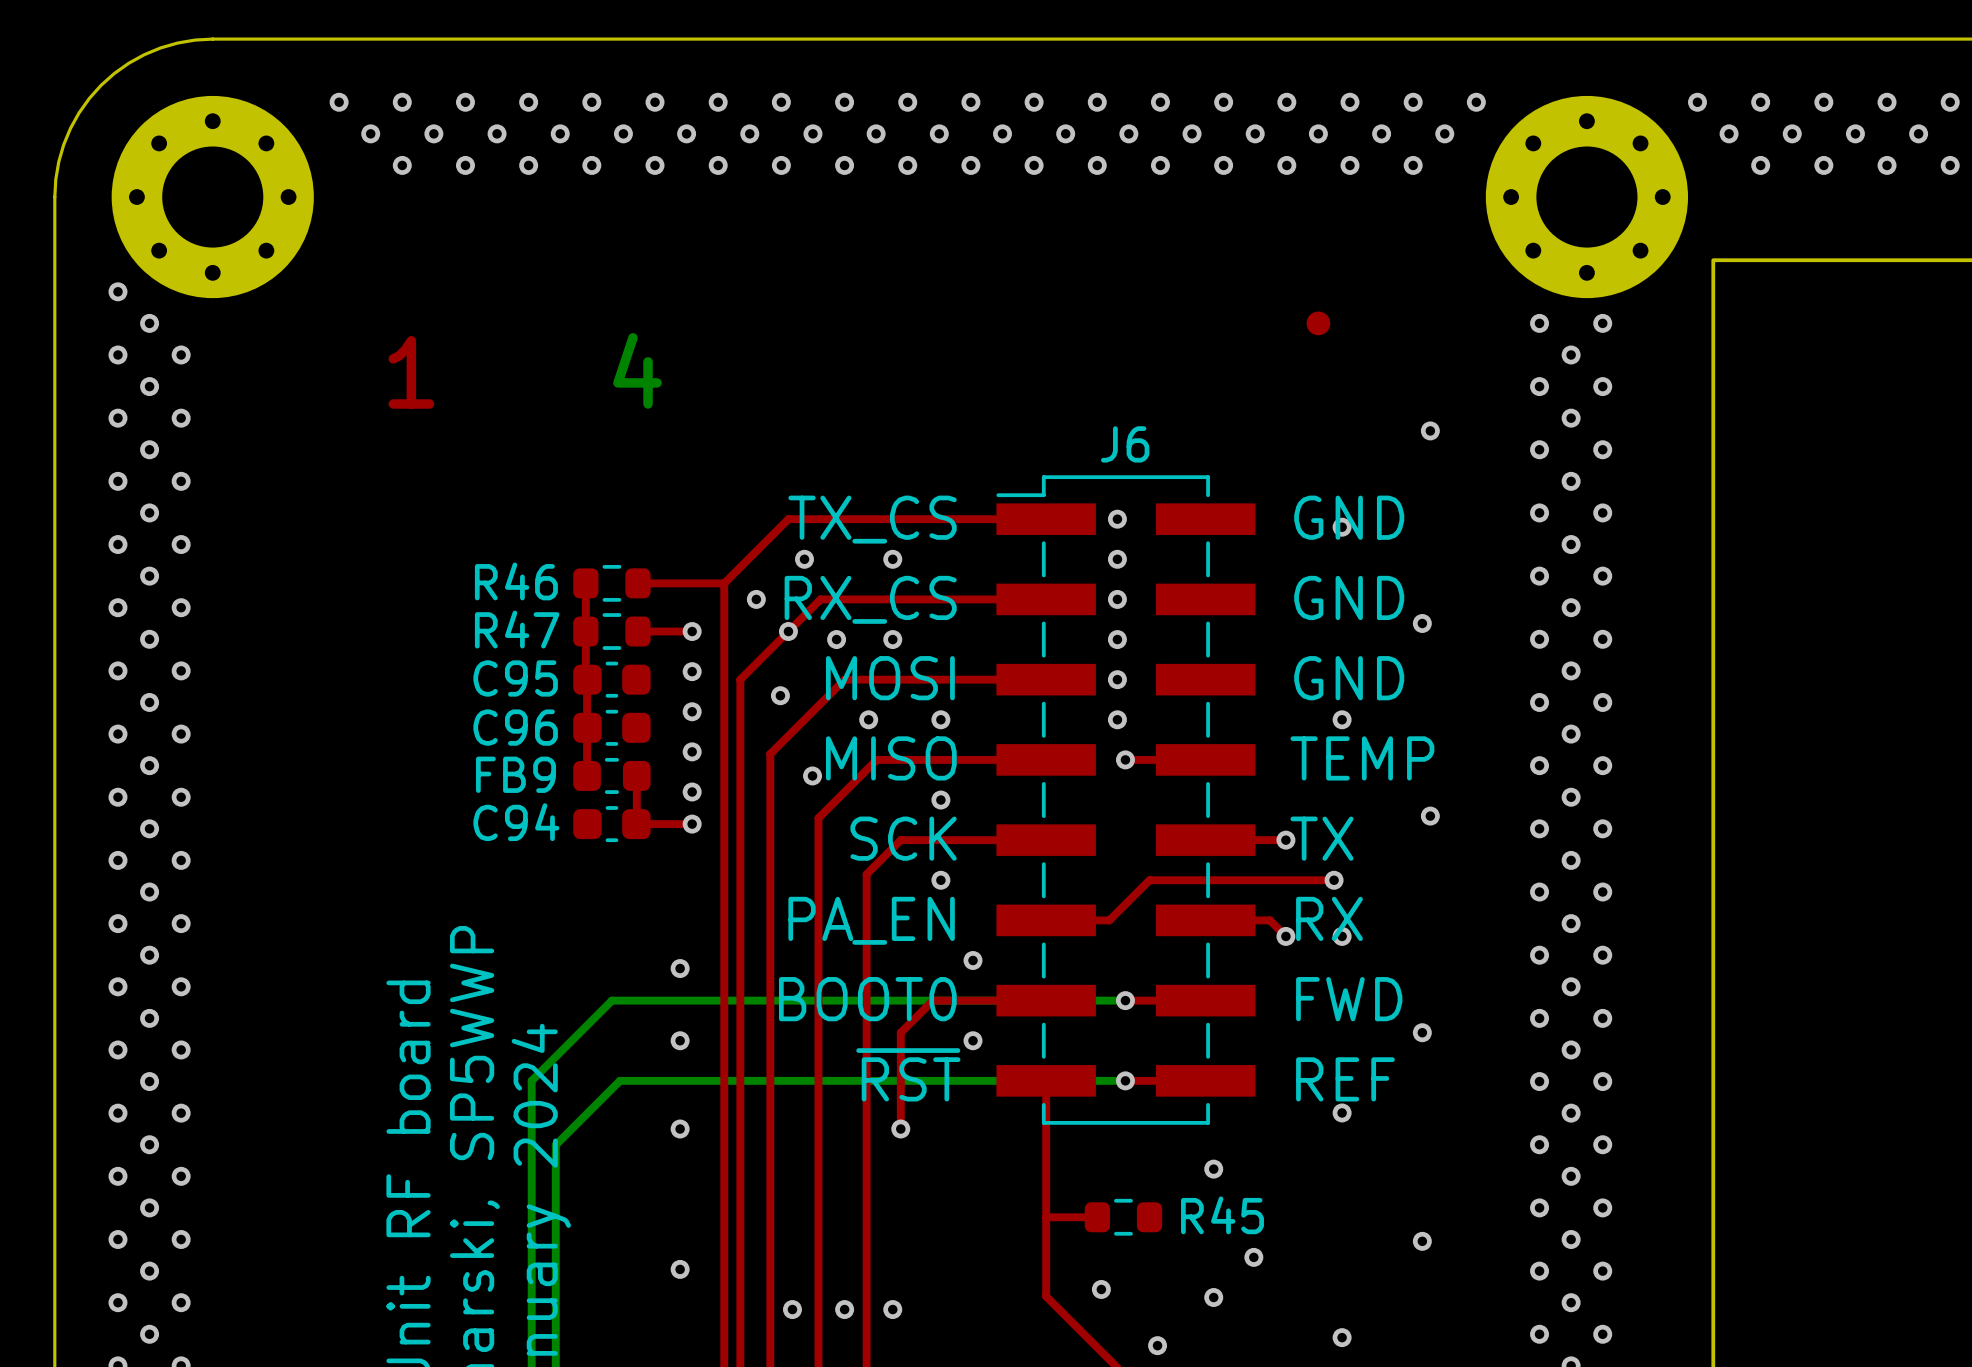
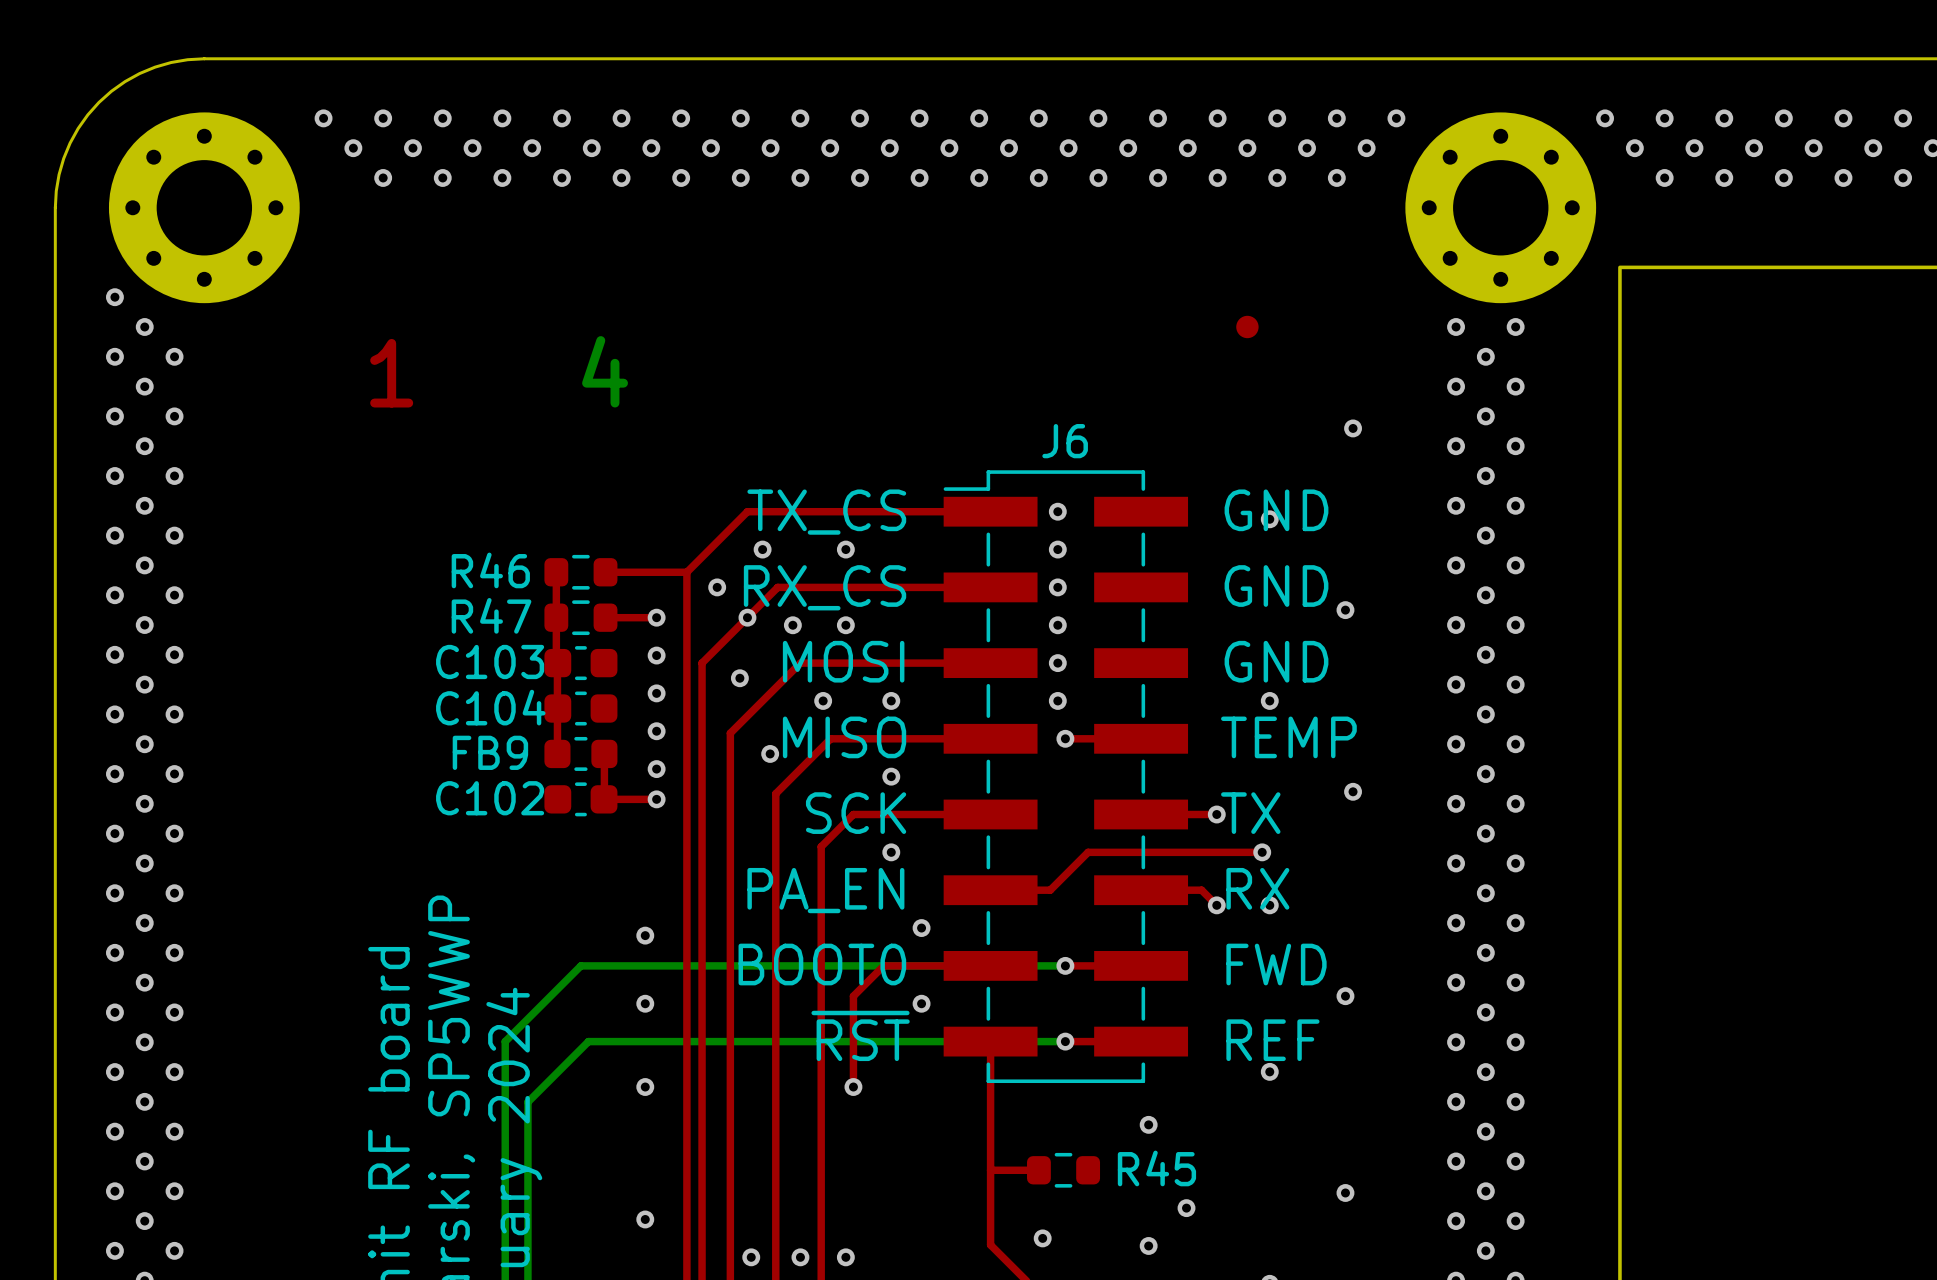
C95 name: C95 (515, 678) -> C103 (490, 661)
C96 name: C96 (515, 727) -> C104 (490, 707)
C94 name: C94 (516, 822) -> C102 (490, 798)

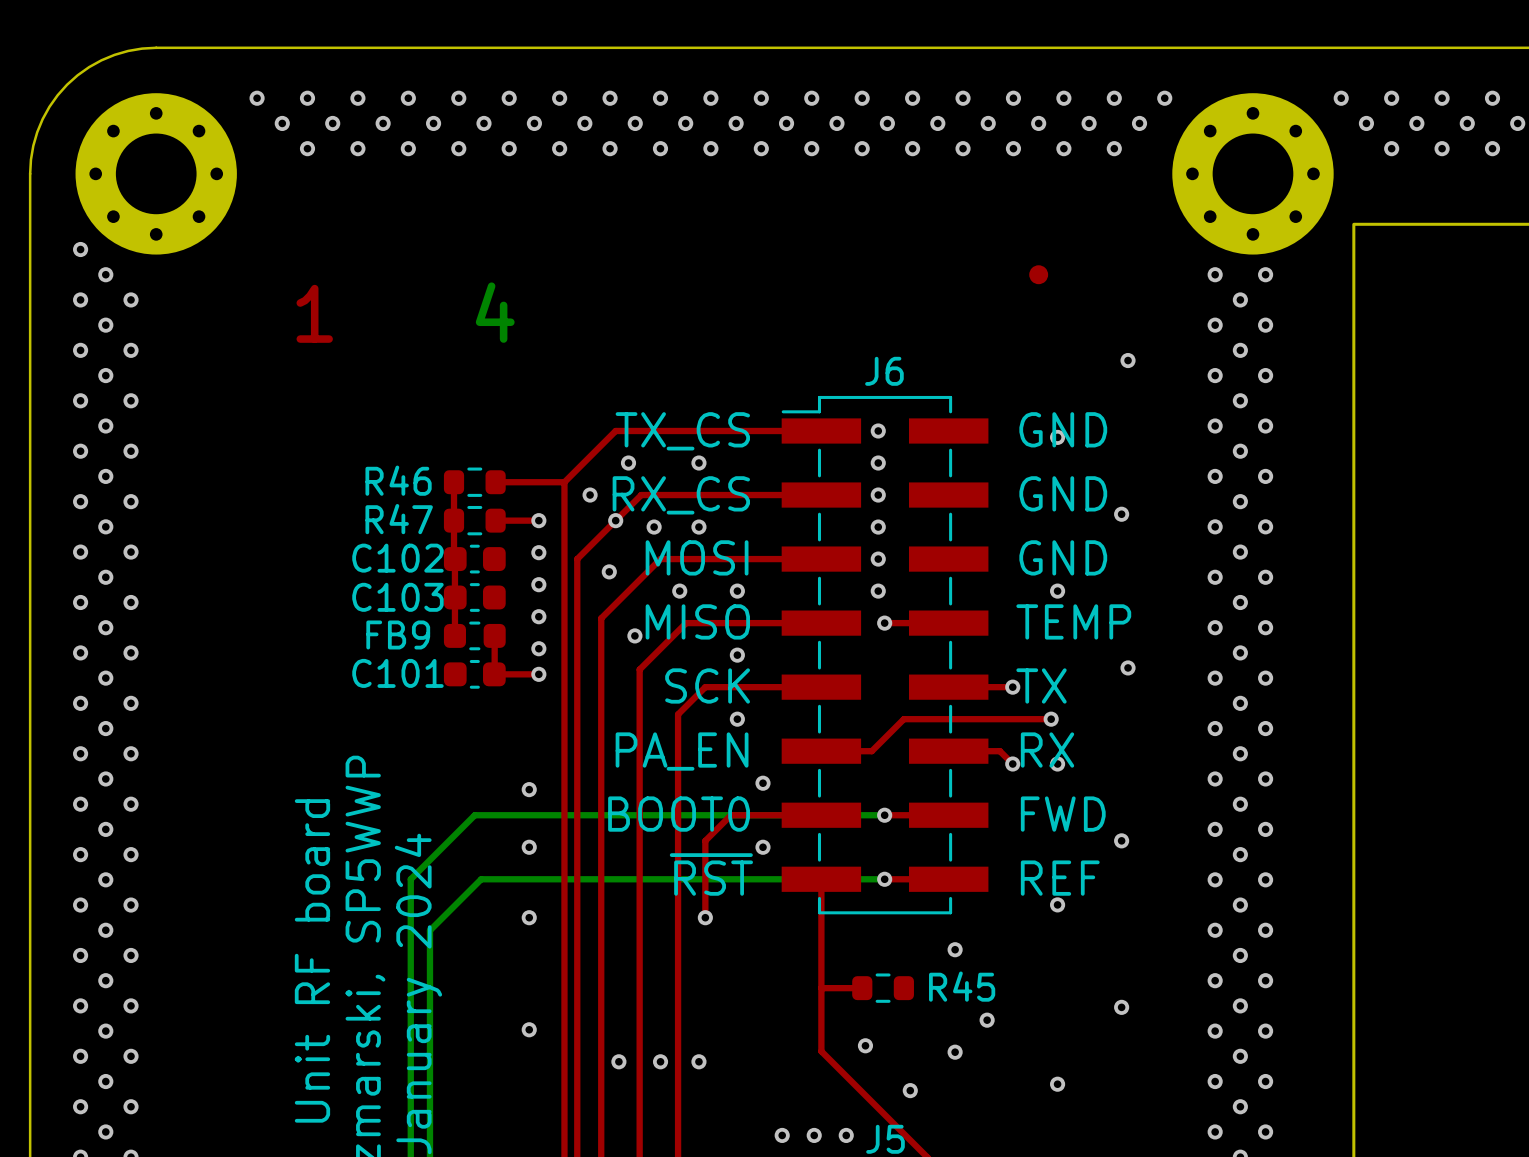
C103 name: C103 (490, 661) -> C102 (397, 558)
C104 name: C104 (490, 707) -> C103 (397, 597)
C102 name: C102 (490, 798) -> C101 (397, 673)

